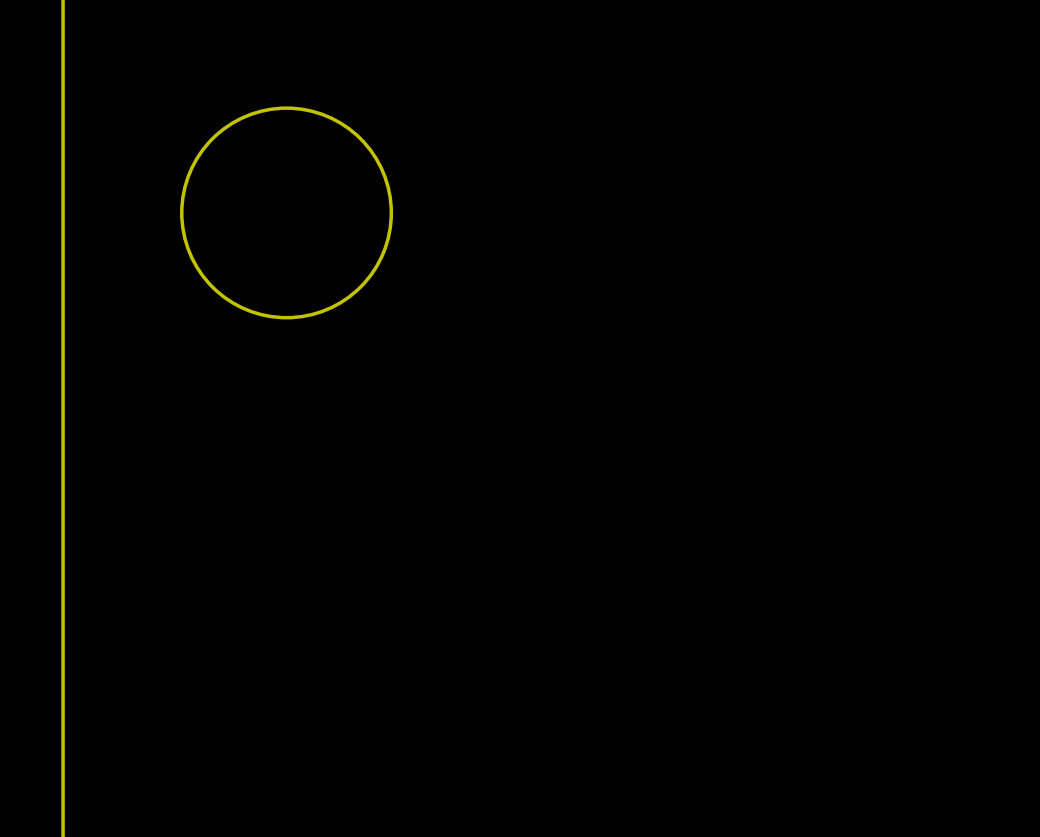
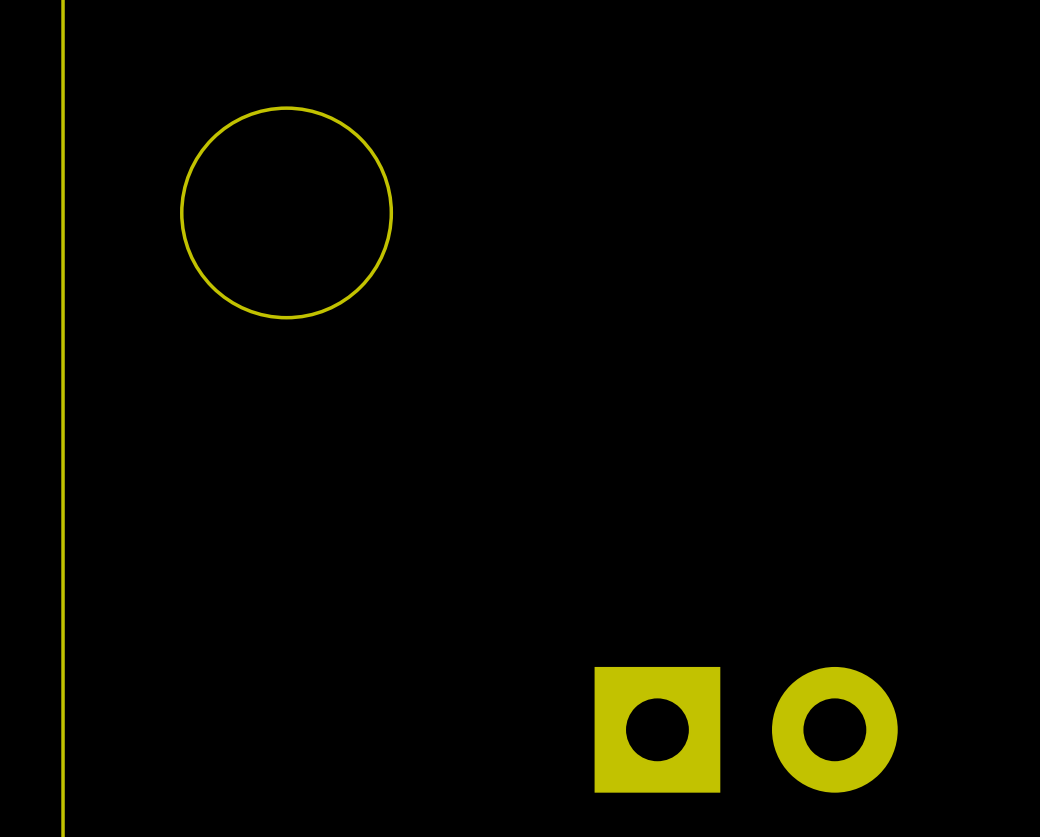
part: none -> (746, 729)

